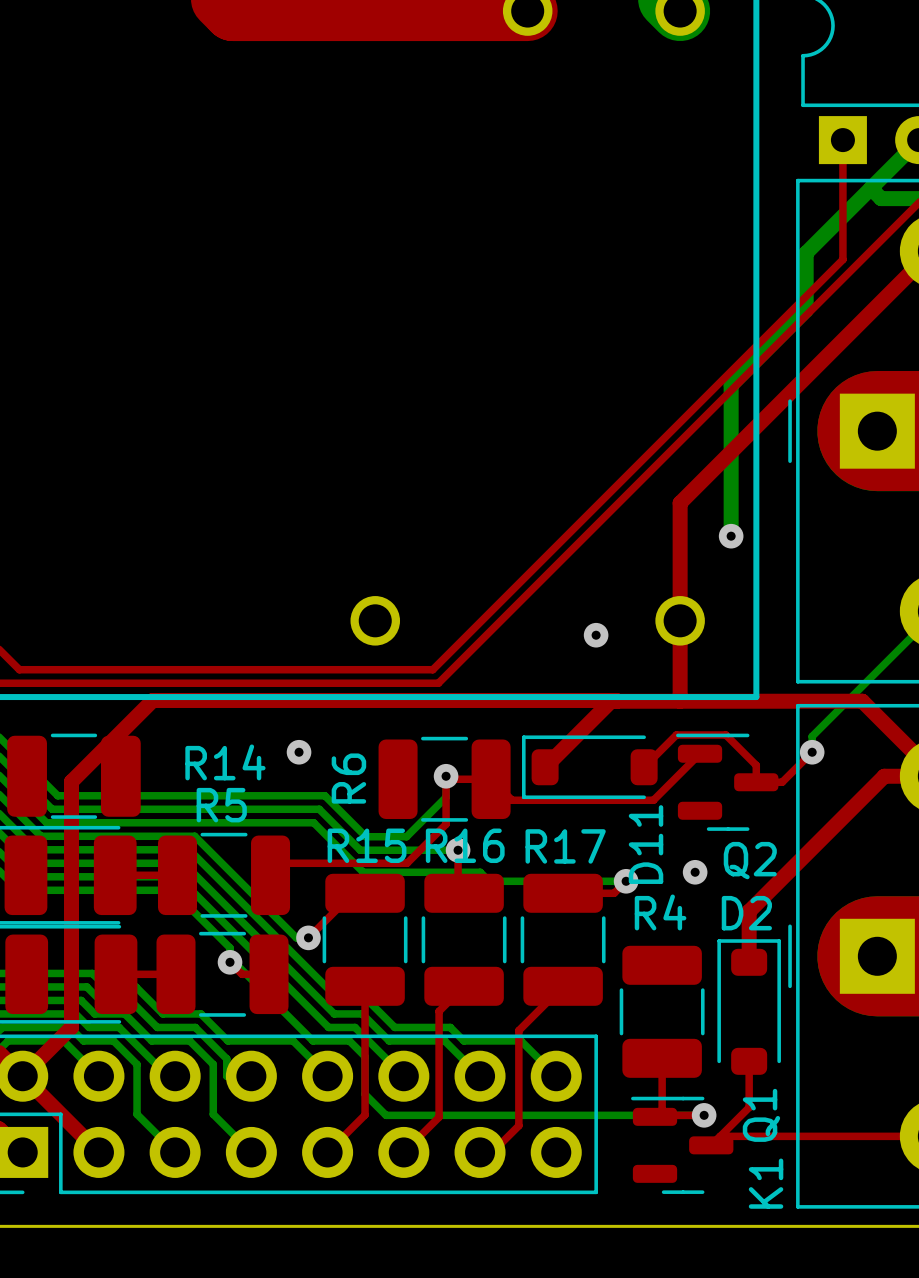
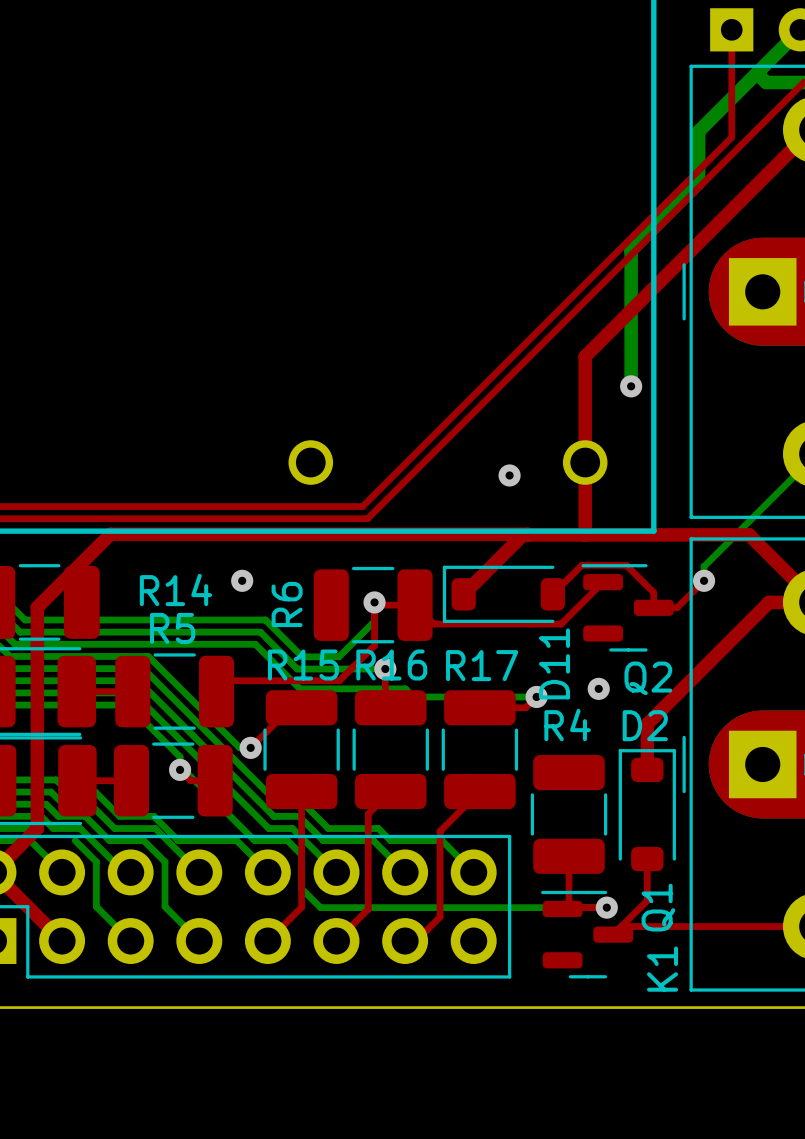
bottom track: (70, 1027) (83, 1040) (113, 1040) -> none
bottom track: (195, 1027) (226, 1058) (226, 1076) (251, 1076) -> (148, 828) (155, 828) (199, 872)

